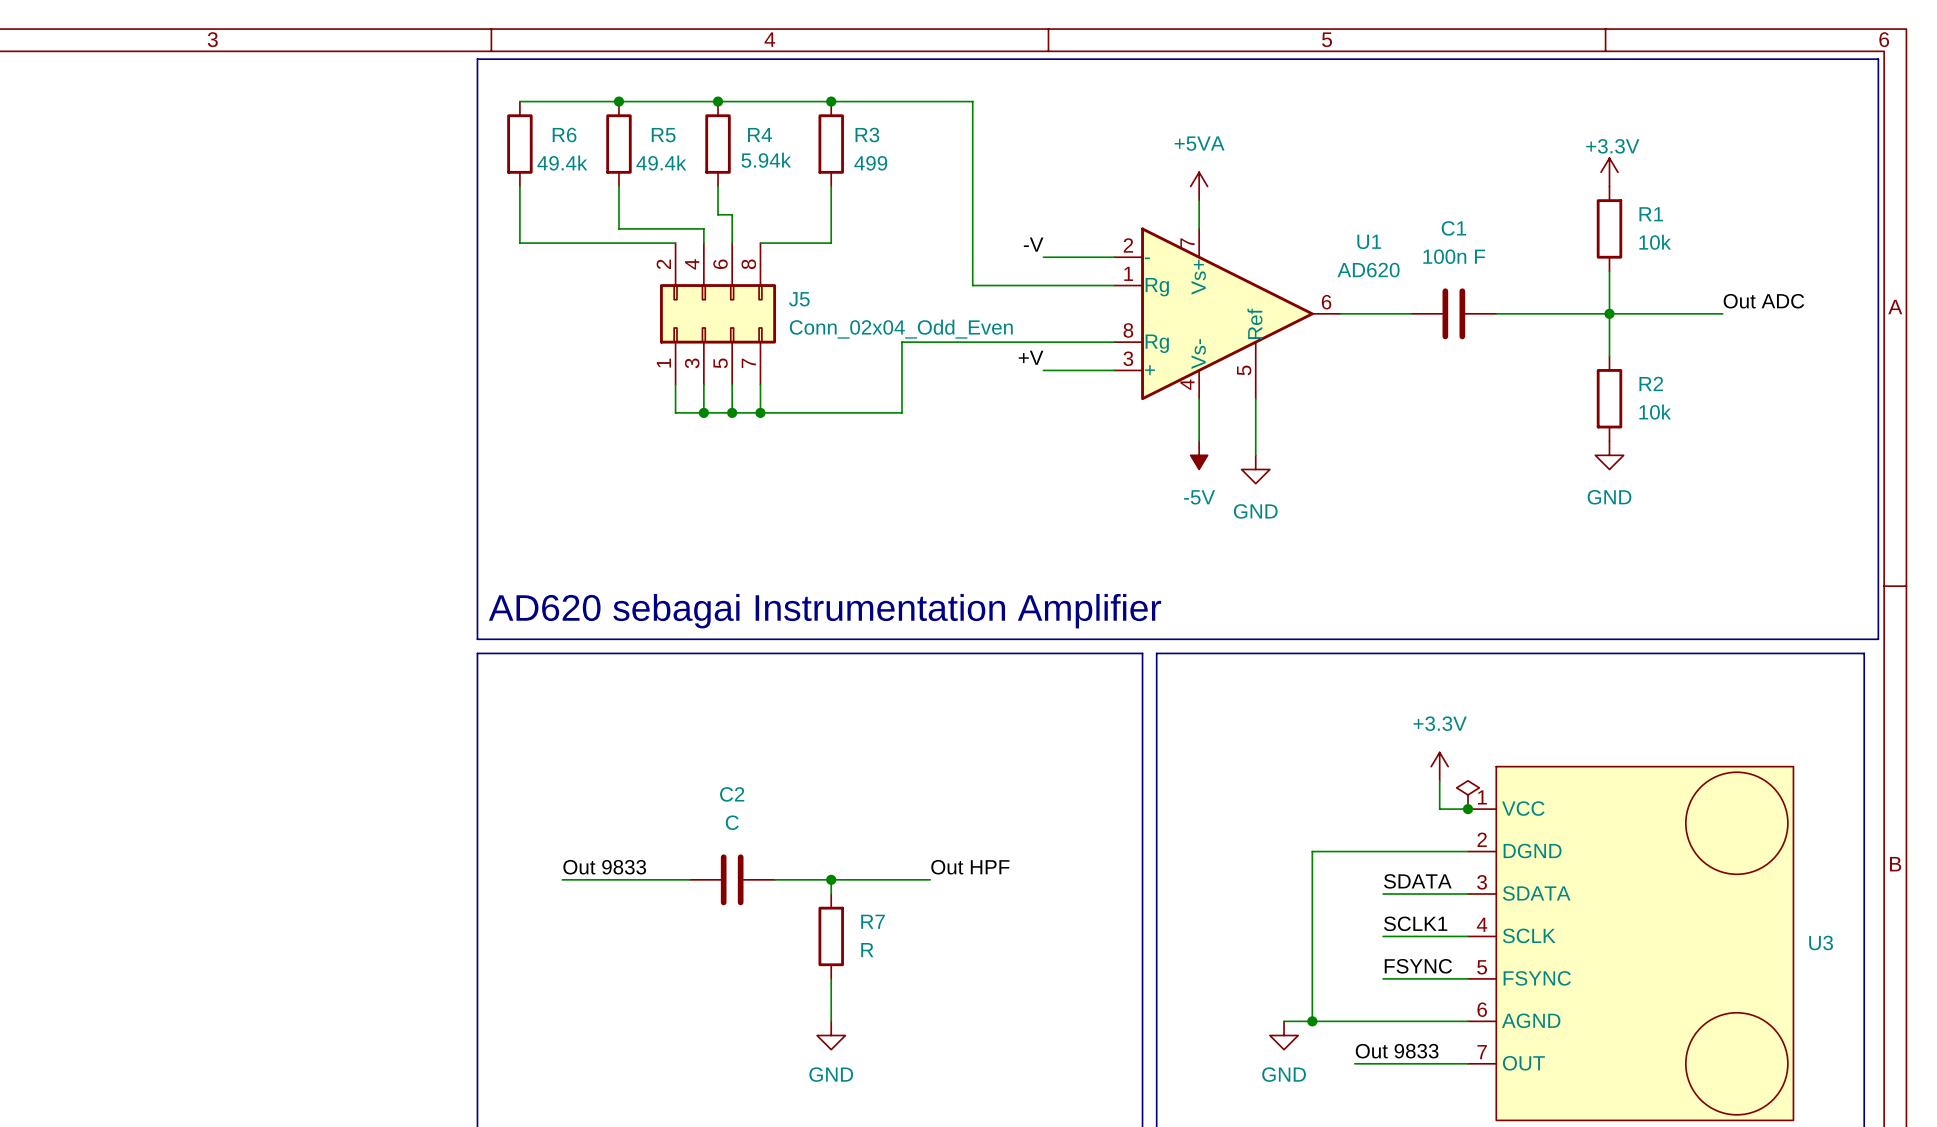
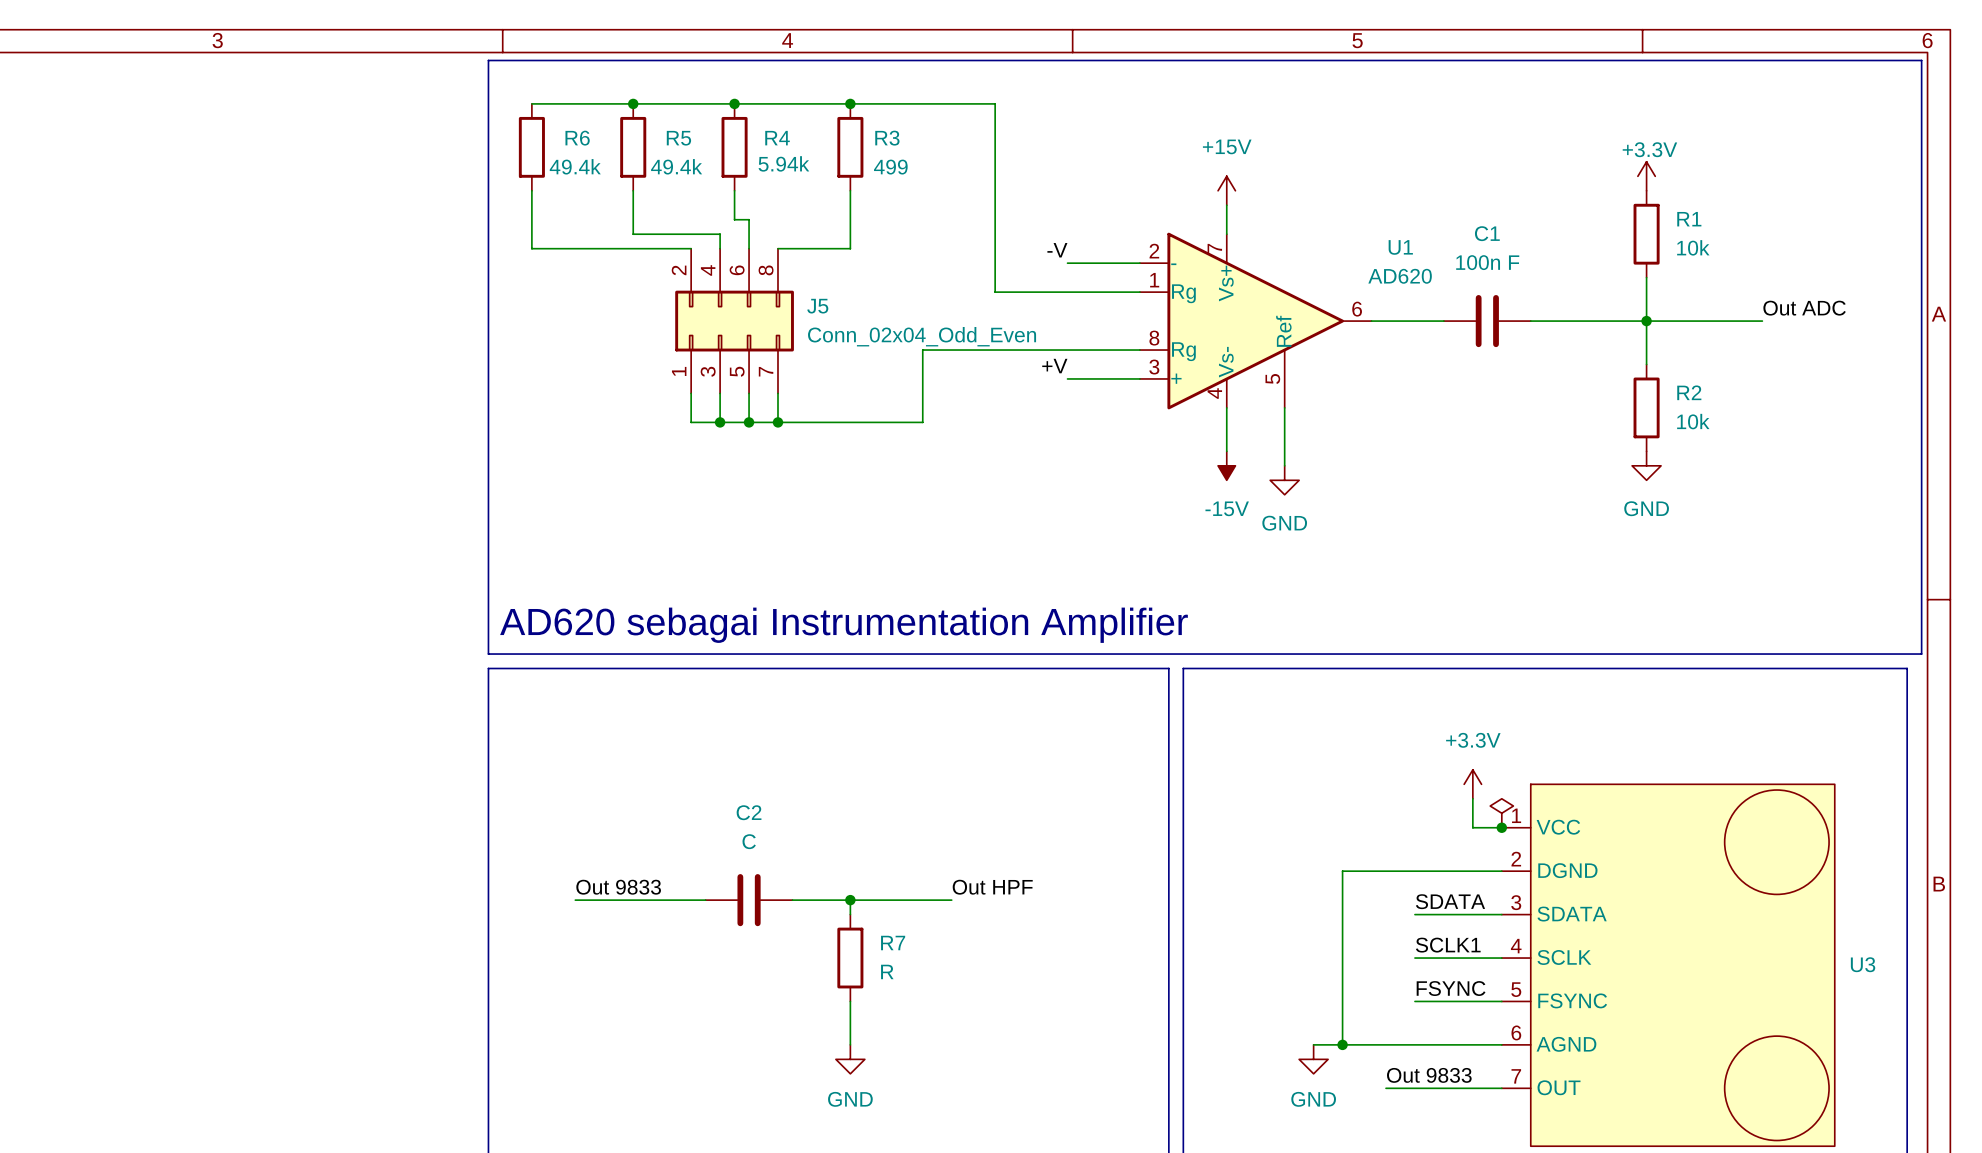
power symbol: +5VA (1199, 186) -> +15V (1226, 190)
power symbol: -5V (1199, 455) -> -15V (1226, 465)

